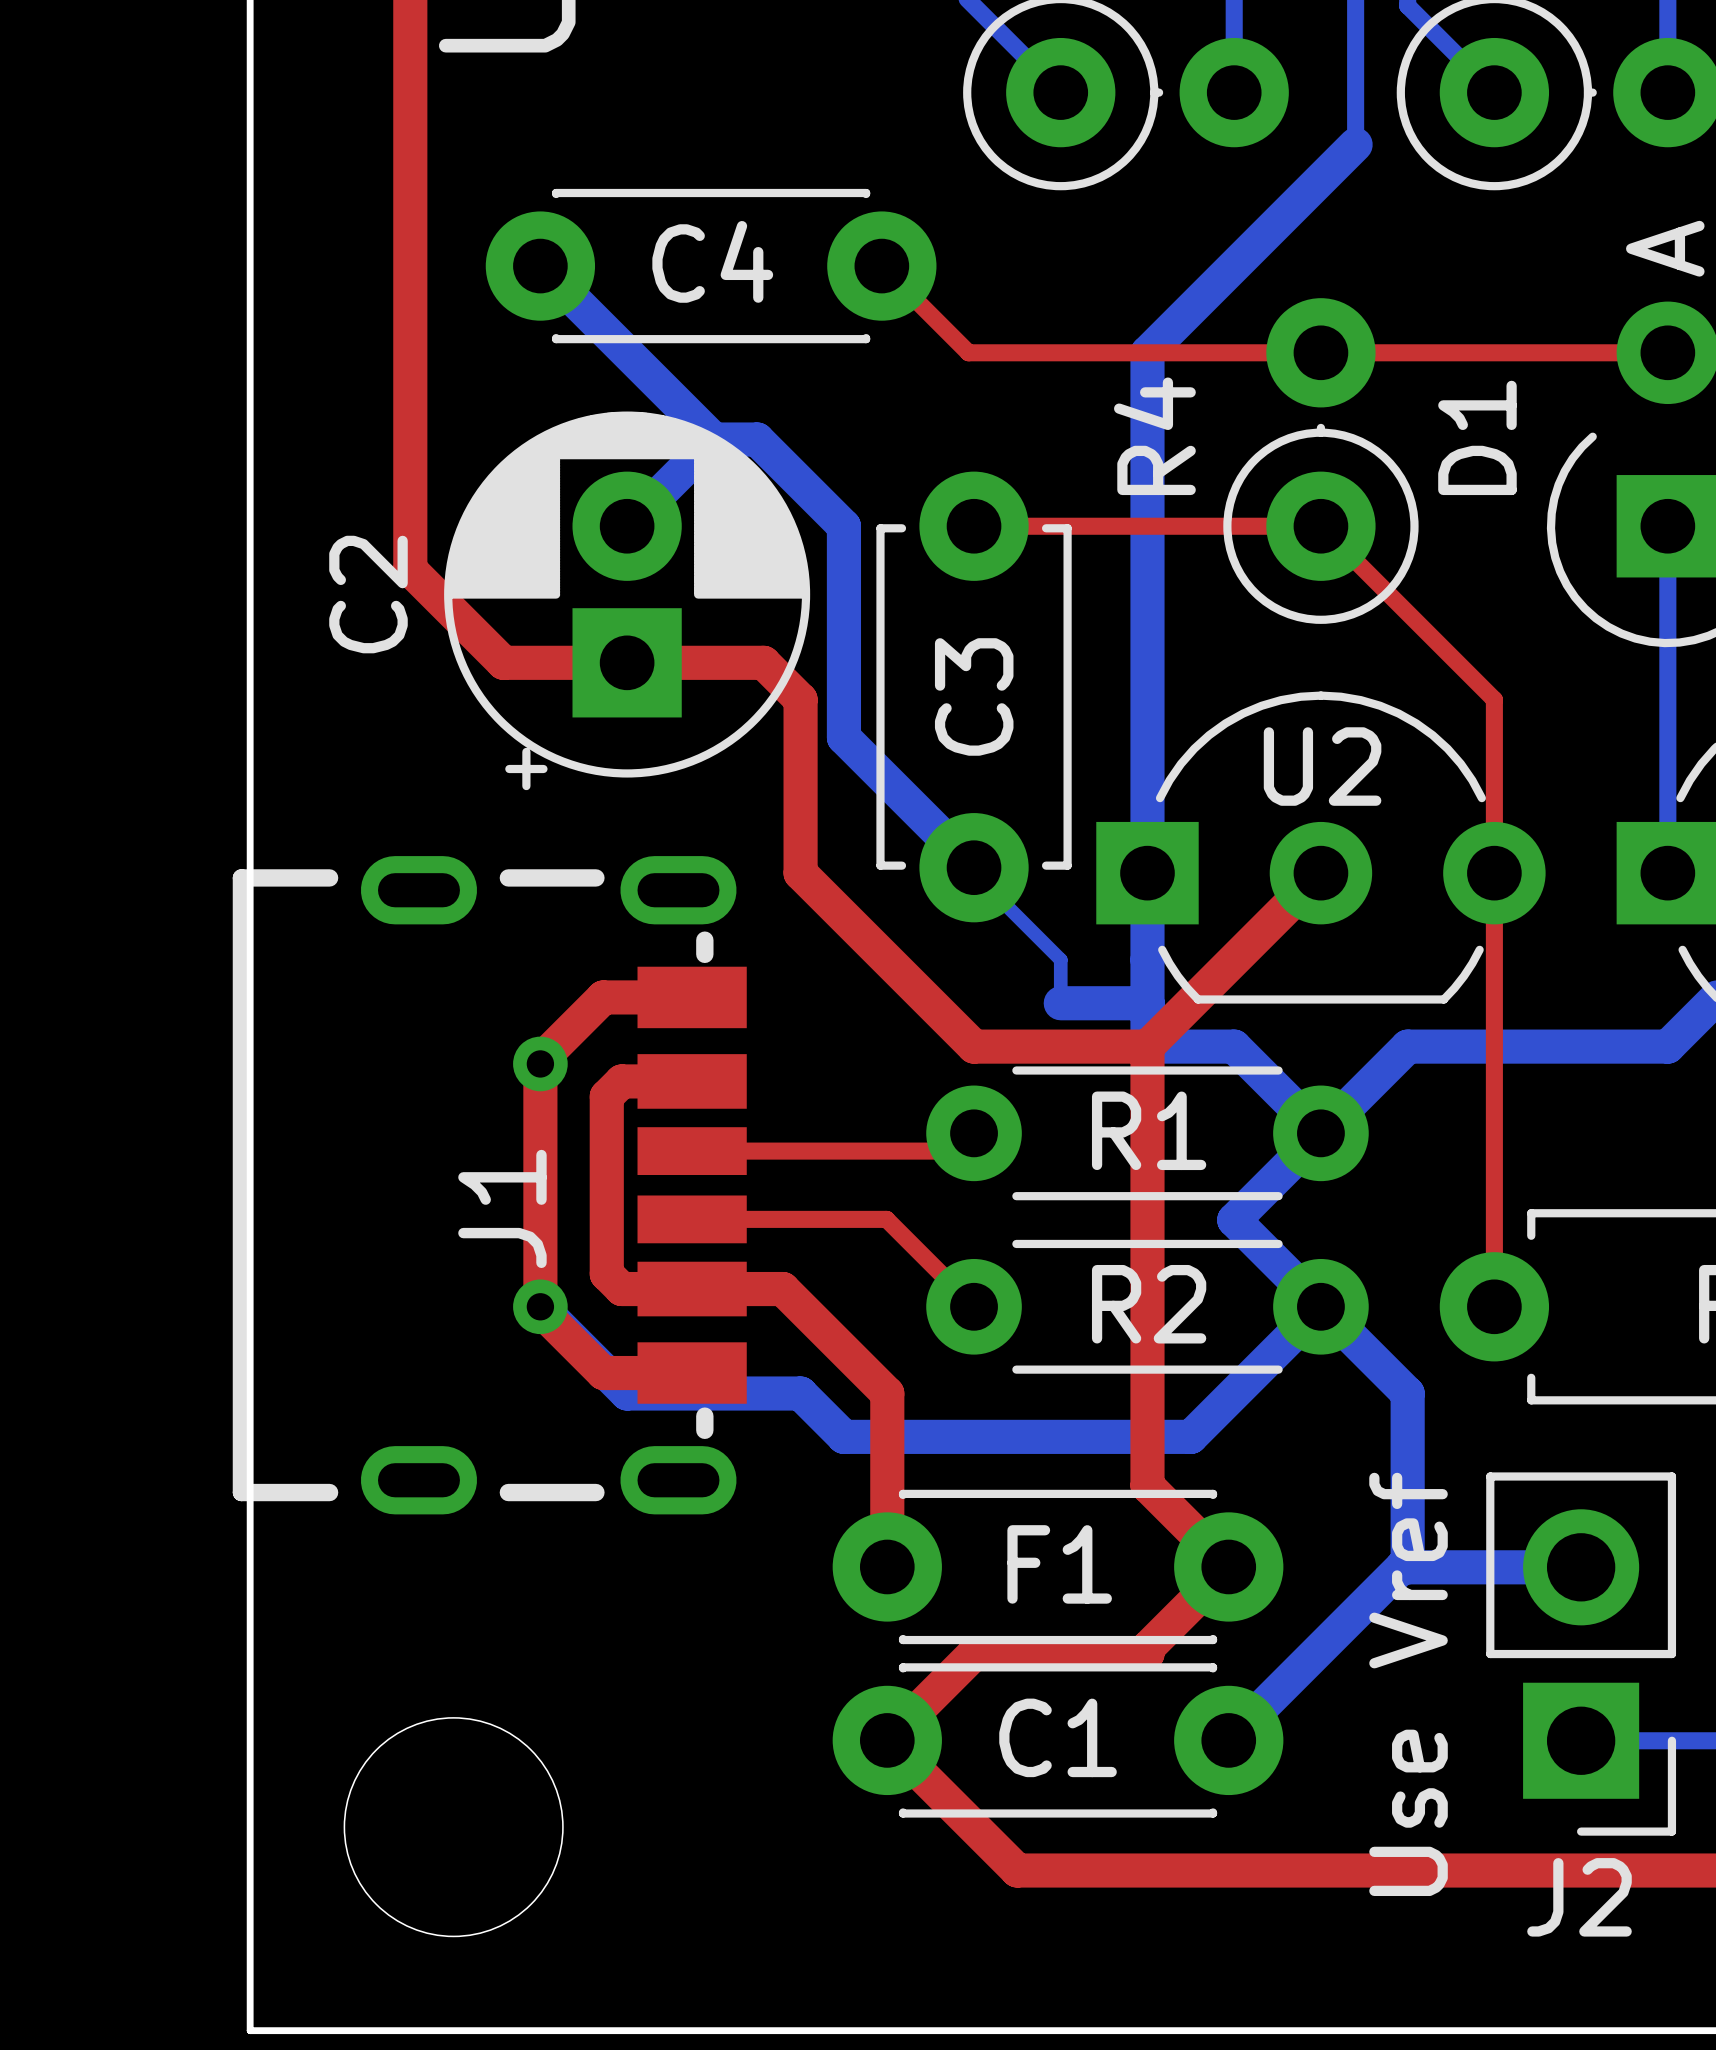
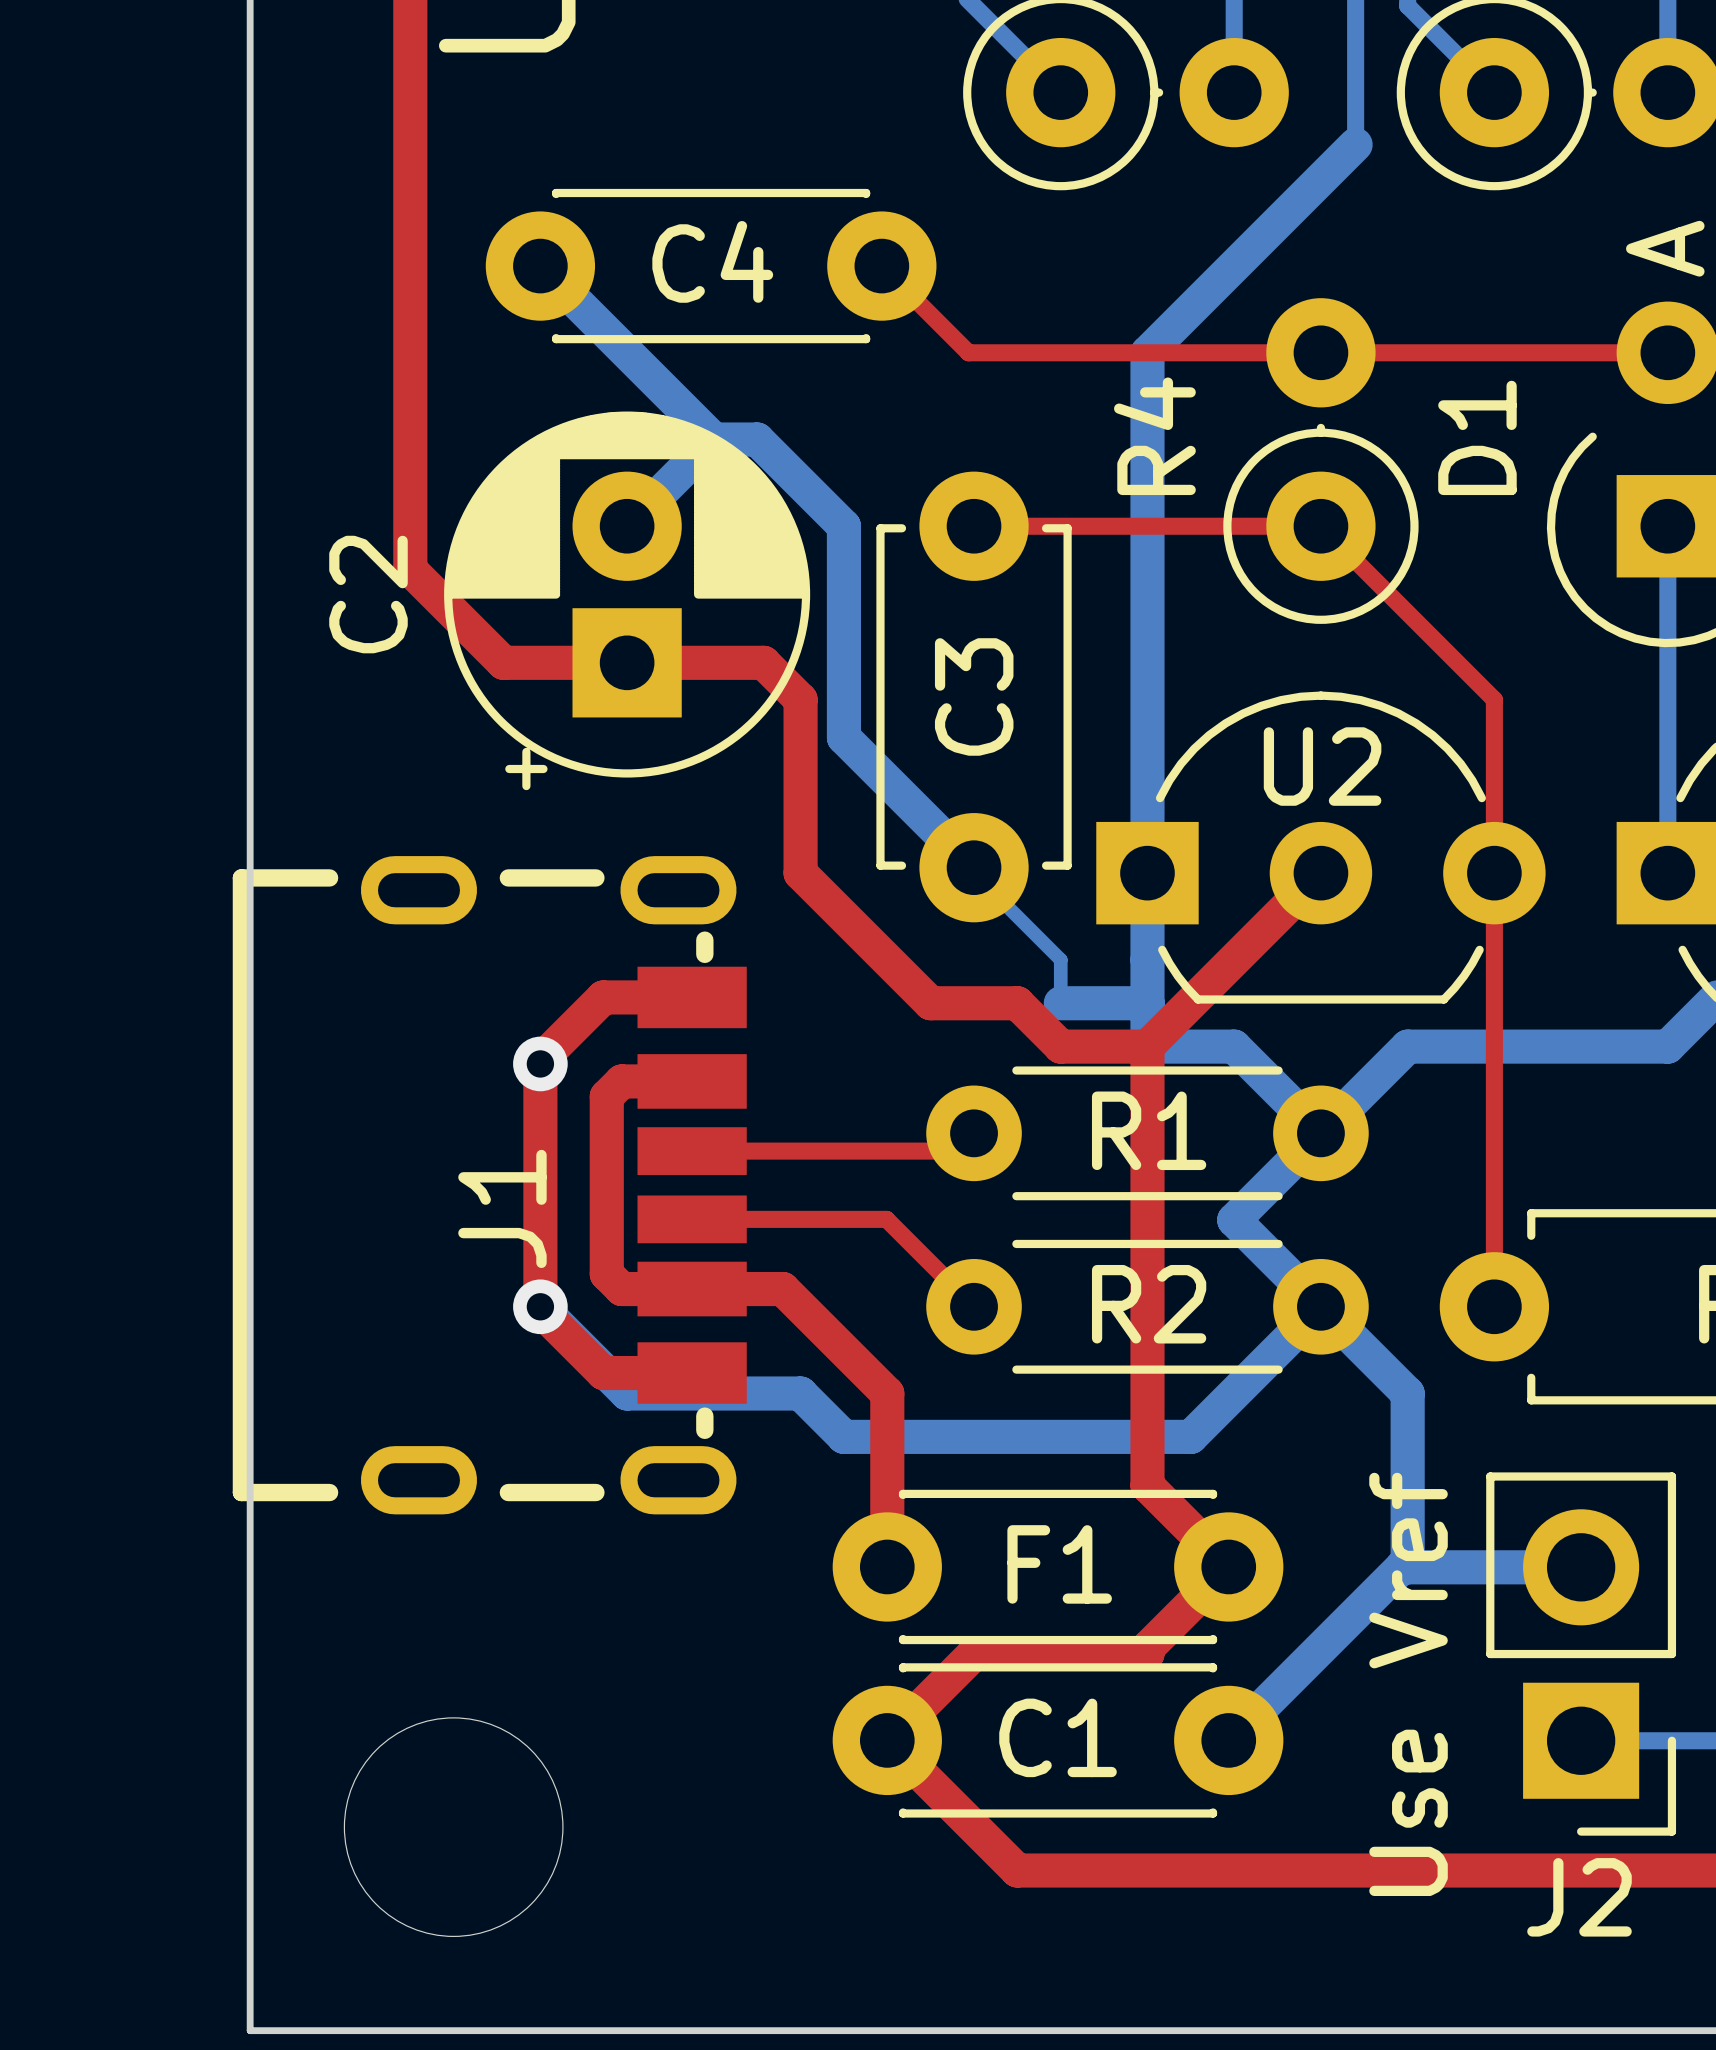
top track: (930, 1003) (974, 1046) (1060, 1046) -> (930, 1003) (1017, 1003) (1060, 1046)

